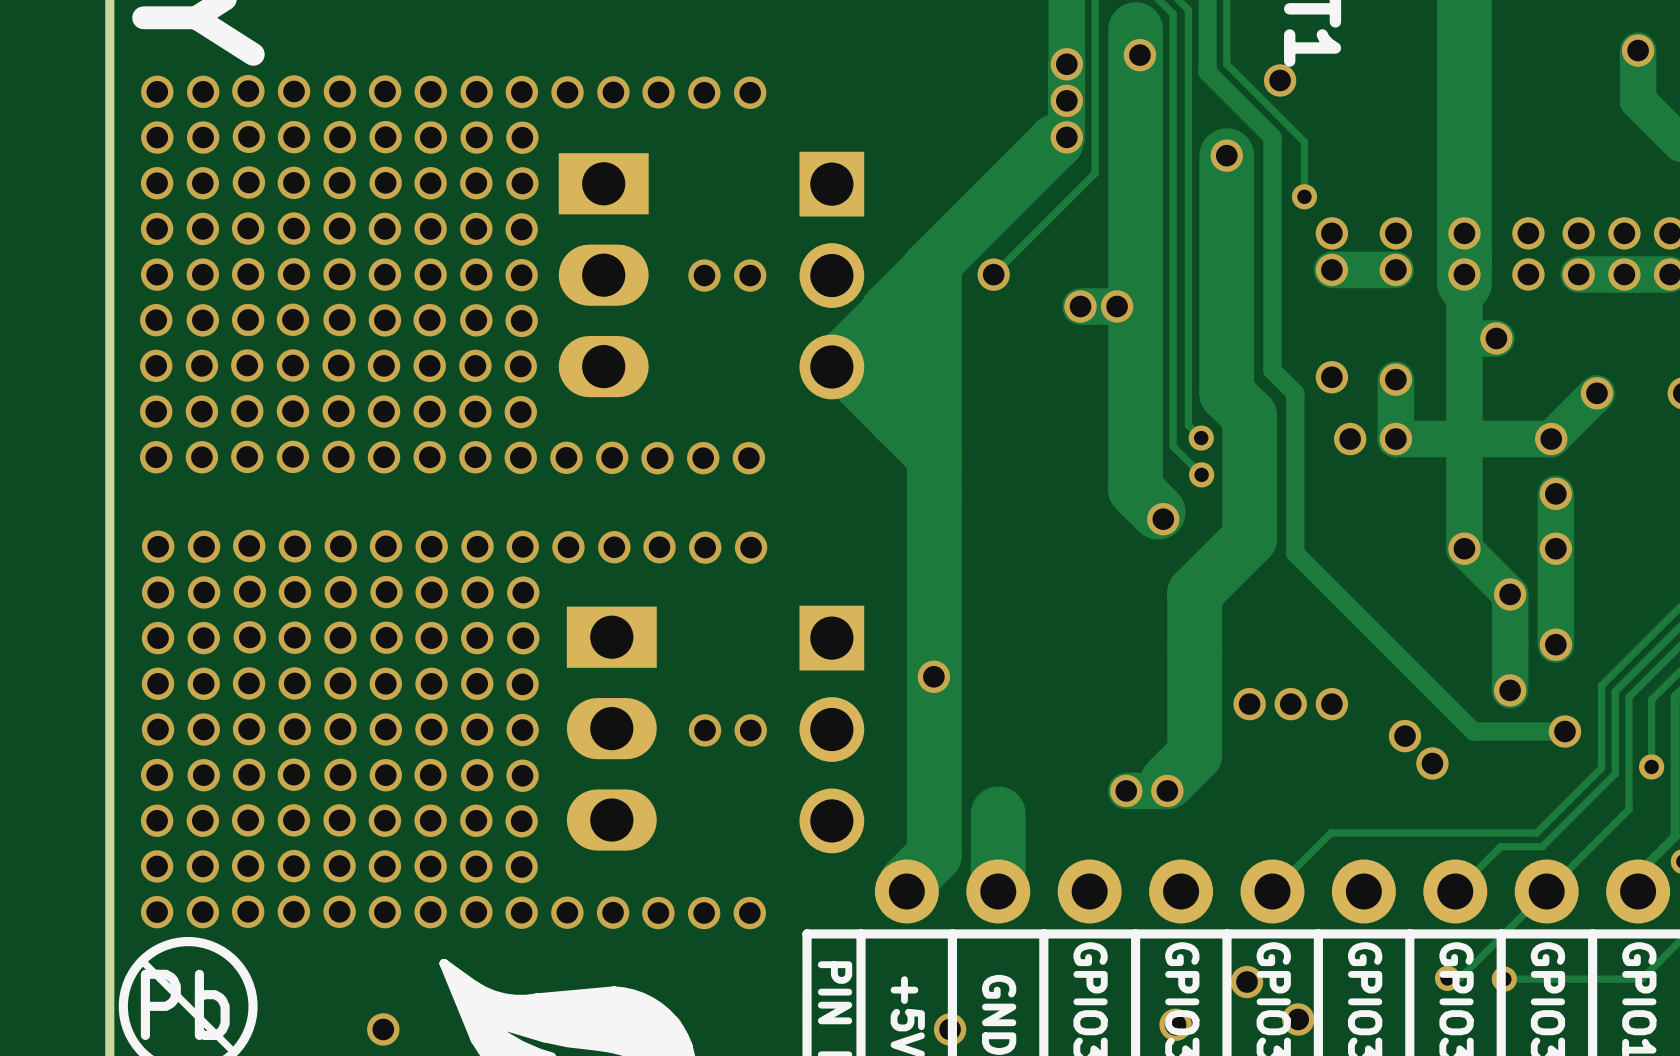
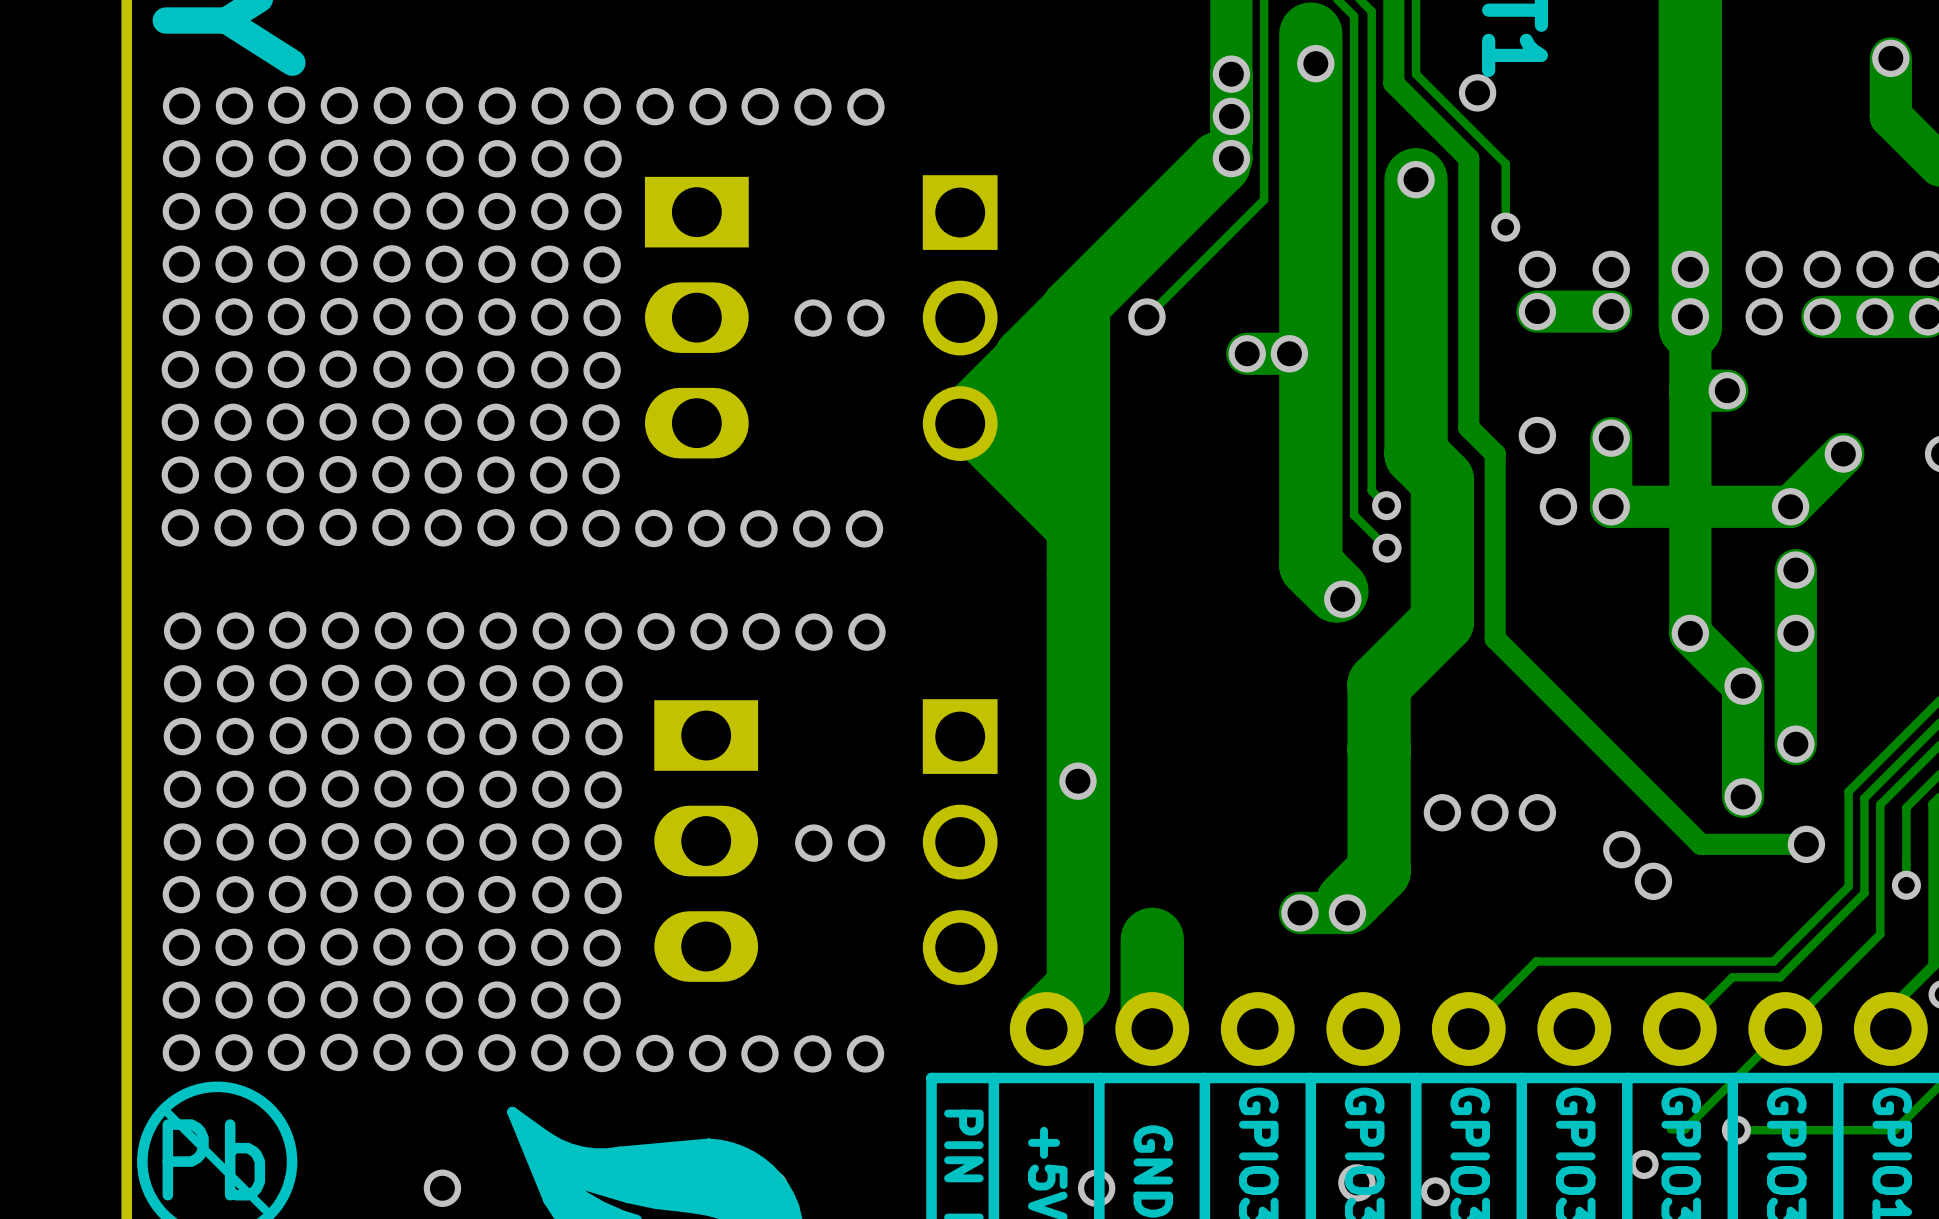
via position: (1447, 978) -> (1644, 1164)
via: (1246, 982) -> none
via: (1298, 1019) -> none
via: none -> (1435, 1191)

